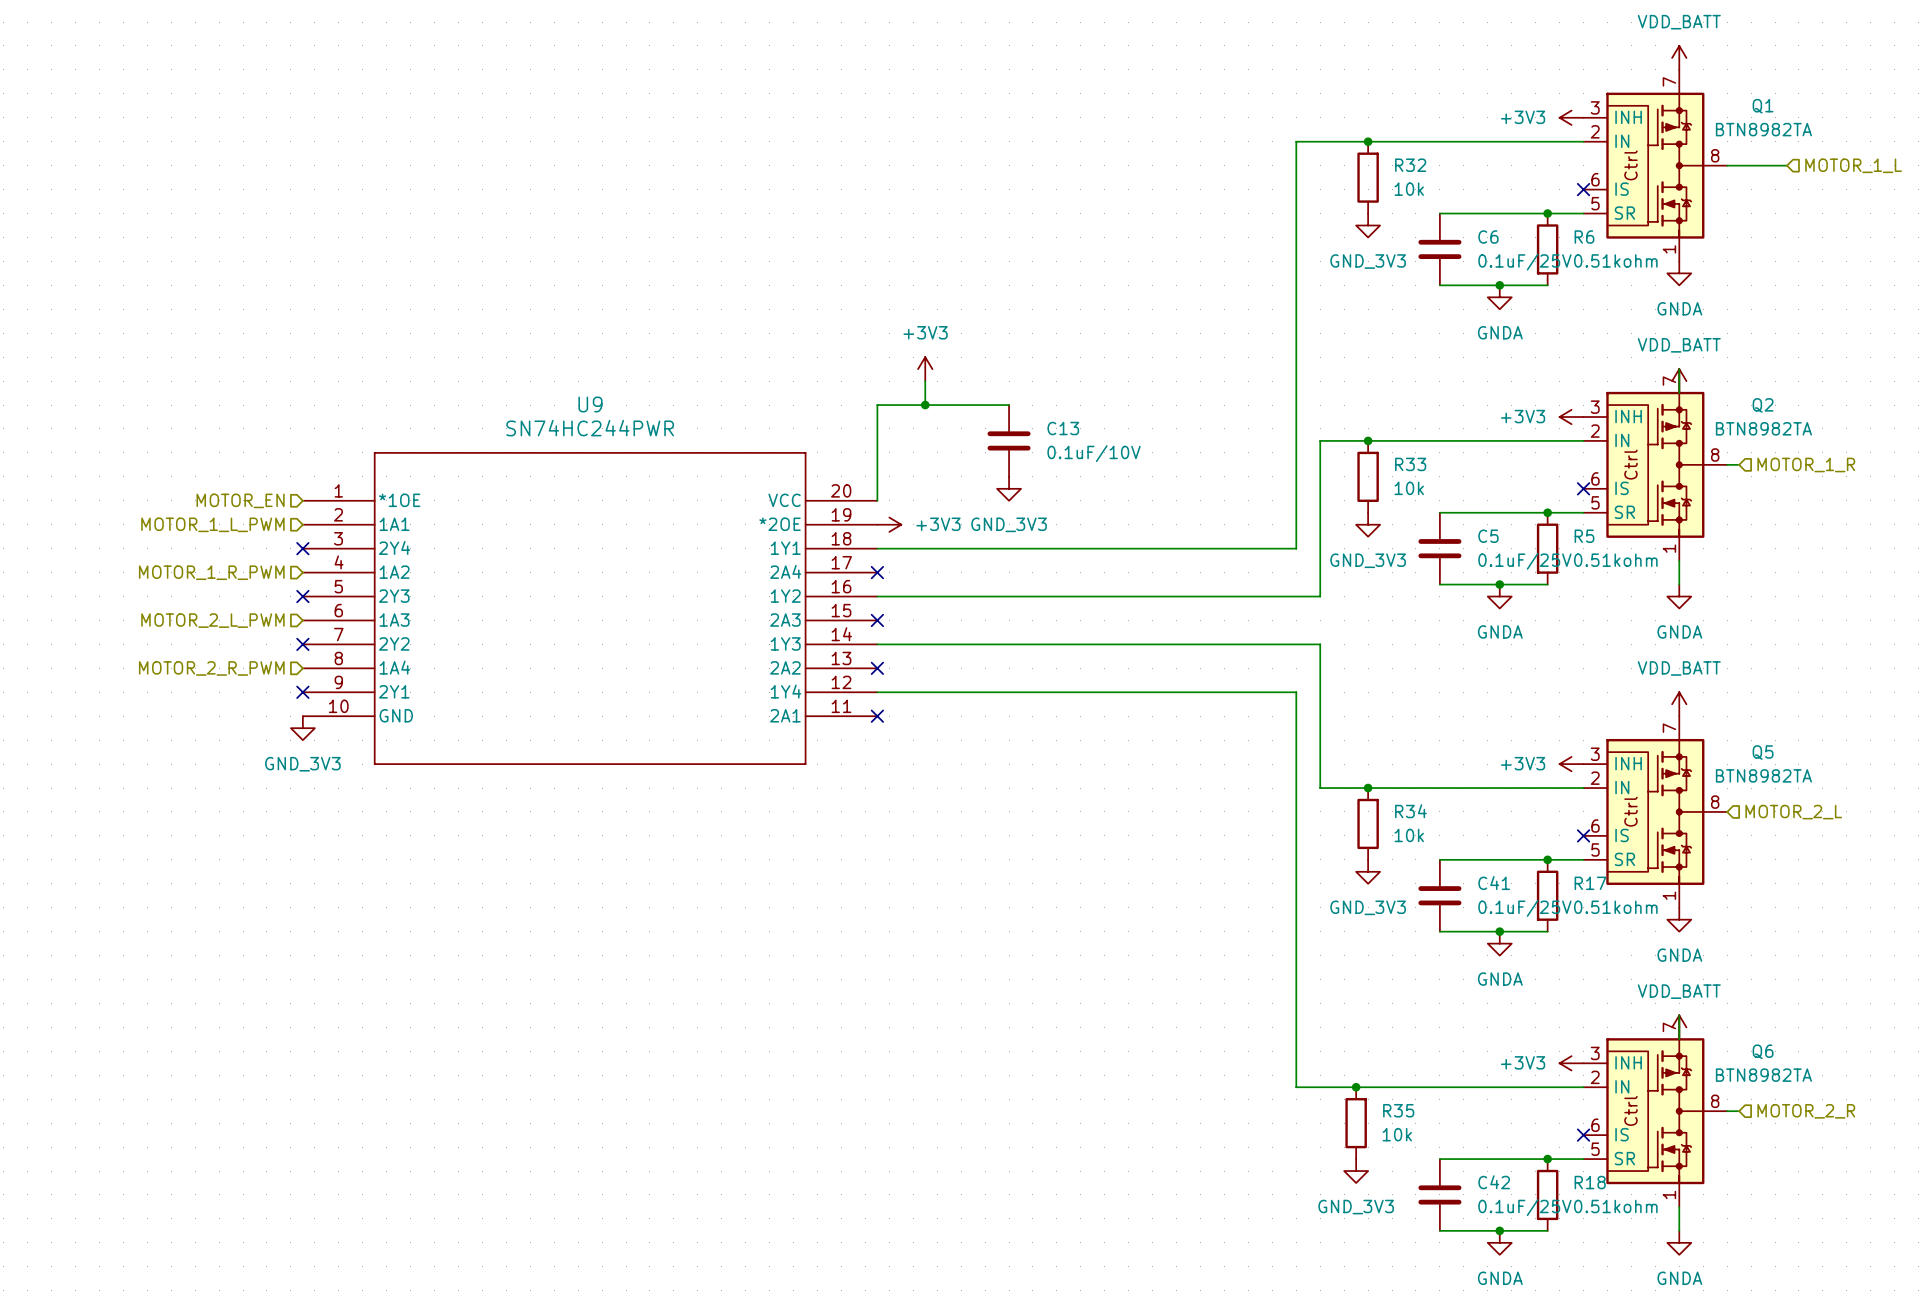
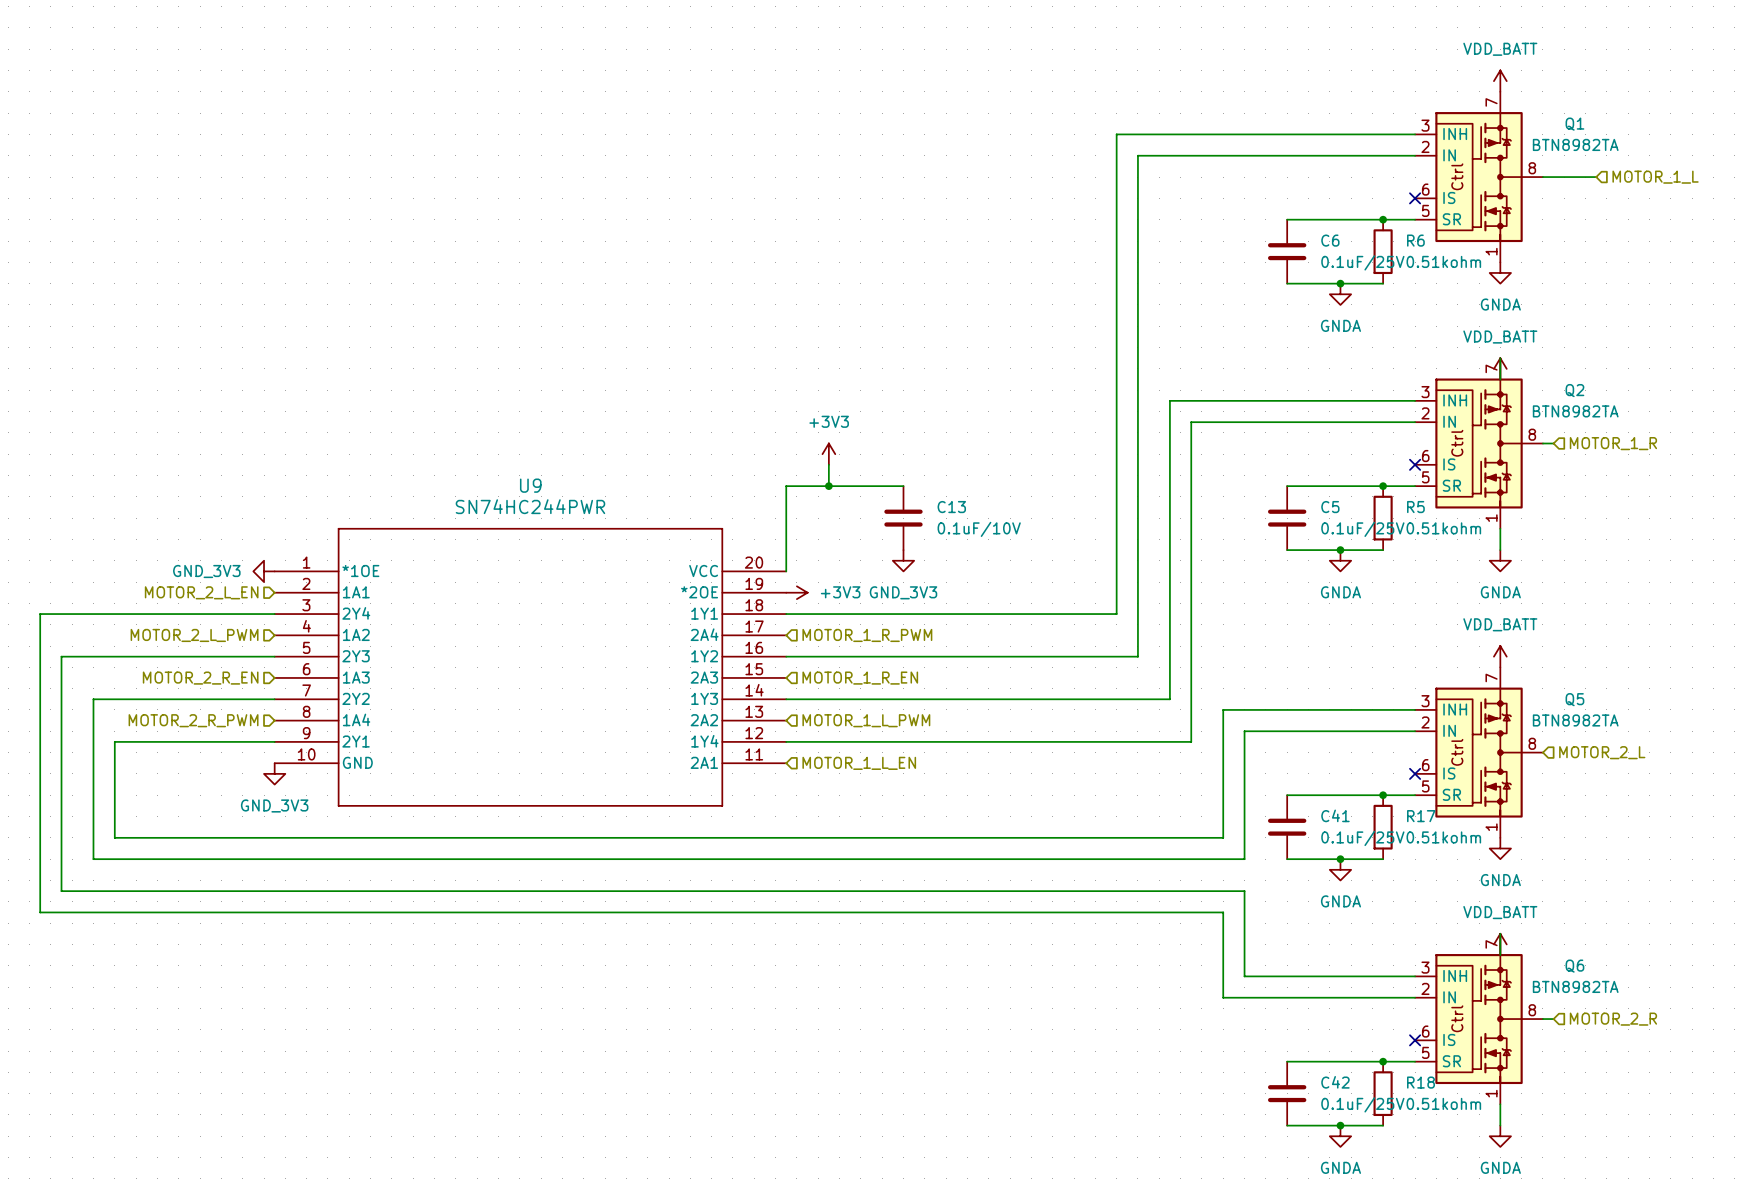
power symbol: +3V3 (1571, 117) -> none
wire: none -> (1415, 134) (1116, 134) (1116, 614) (786, 614)
wire: (1296, 141) (1296, 548) (877, 548) -> (1159, 155) (1137, 155) (1137, 656) (786, 656)
junction: (1368, 141) -> none
R32: 10k (1368, 177) -> none
power symbol: GND_3V3 (1368, 225) -> none
power symbol: +3V3 (925, 369) -> none
wire: (925, 381) (925, 405) -> (828, 464) (828, 486)
junction: (925, 405) -> none
wire: (1009, 405) (877, 405) (877, 500) -> (903, 486) (786, 486) (786, 571)
power symbol: +3V3 (1571, 417) -> none
wire: none -> (1415, 400) (1169, 400) (1169, 699) (786, 699)
C13 position: (1009, 440) -> (903, 518)
wire: (1332, 440) (1320, 440) (1320, 596) (877, 596) -> (1191, 422) (1191, 741) (786, 741)
junction: (1368, 440) -> none
power symbol: none -> +3V3 (828, 454)
R33: 10k (1368, 476) -> none
power symbol position: GND_3V3 (1009, 488) -> GND_3V3 (903, 560)
hierarchical label: MOTOR_EN (240, 500) -> none
junction: none -> (828, 486)
hierarchical label: MOTOR_1_L_PWM (212, 524) -> none
power symbol: +3V3 (889, 524) -> none
power symbol: GND_3V3 (1368, 524) -> none
no-connect mark: (302, 548) -> none
hierarchical label: MOTOR_1_R_PWM (211, 572) -> none
no-connect mark: (877, 572) -> none
no-connect mark: (302, 596) -> none
power symbol: none -> GND_3V3 (264, 571)
U9 position: (590, 608) -> (530, 667)
hierarchical label position: MOTOR_2_L_PWM (212, 620) -> MOTOR_2_L_PWM (194, 635)
no-connect mark: (877, 620) -> none
hierarchical label: none -> MOTOR_2_L_EN (201, 592)
power symbol: none -> +3V3 (796, 592)
no-connect mark: (302, 644) -> none
wire: (877, 644) (1320, 644) (1320, 788) (1392, 788) -> (274, 699) (93, 699) (93, 859) (1244, 859) (1244, 731)
hierarchical label position: MOTOR_2_R_PWM (211, 668) -> MOTOR_2_R_PWM (193, 720)
no-connect mark: (877, 668) -> none
hierarchical label: none -> MOTOR_1_R_PWM (867, 635)
no-connect mark: (302, 692) -> none
wire: (877, 692) (1296, 692) (1296, 1087) (1368, 1087) -> (274, 614) (40, 614) (40, 912) (1223, 912) (1223, 997)
wire: none -> (274, 656) (61, 656) (61, 891) (1244, 891) (1244, 976) (1415, 976)
no-connect mark: (877, 716) -> none
hierarchical label: none -> MOTOR_2_R_EN (200, 678)
power symbol: GND_3V3 (302, 728) -> none
hierarchical label: none -> MOTOR_1_R_EN (860, 678)
power symbol: +3V3 (1571, 764) -> none
wire: none -> (1415, 709) (1223, 709) (1223, 837) (114, 837) (114, 741) (274, 741)
hierarchical label: none -> MOTOR_1_L_PWM (866, 720)
junction: (1368, 788) -> none
R34: 10k (1368, 823) -> none
hierarchical label: none -> MOTOR_1_L_EN (859, 763)
power symbol: none -> GND_3V3 (274, 773)
power symbol: GND_3V3 (1368, 871) -> none
power symbol: +3V3 (1571, 1063) -> none
junction: (1356, 1087) -> none
R35: 10k (1356, 1123) -> none
power symbol: GND_3V3 (1356, 1171) -> none

